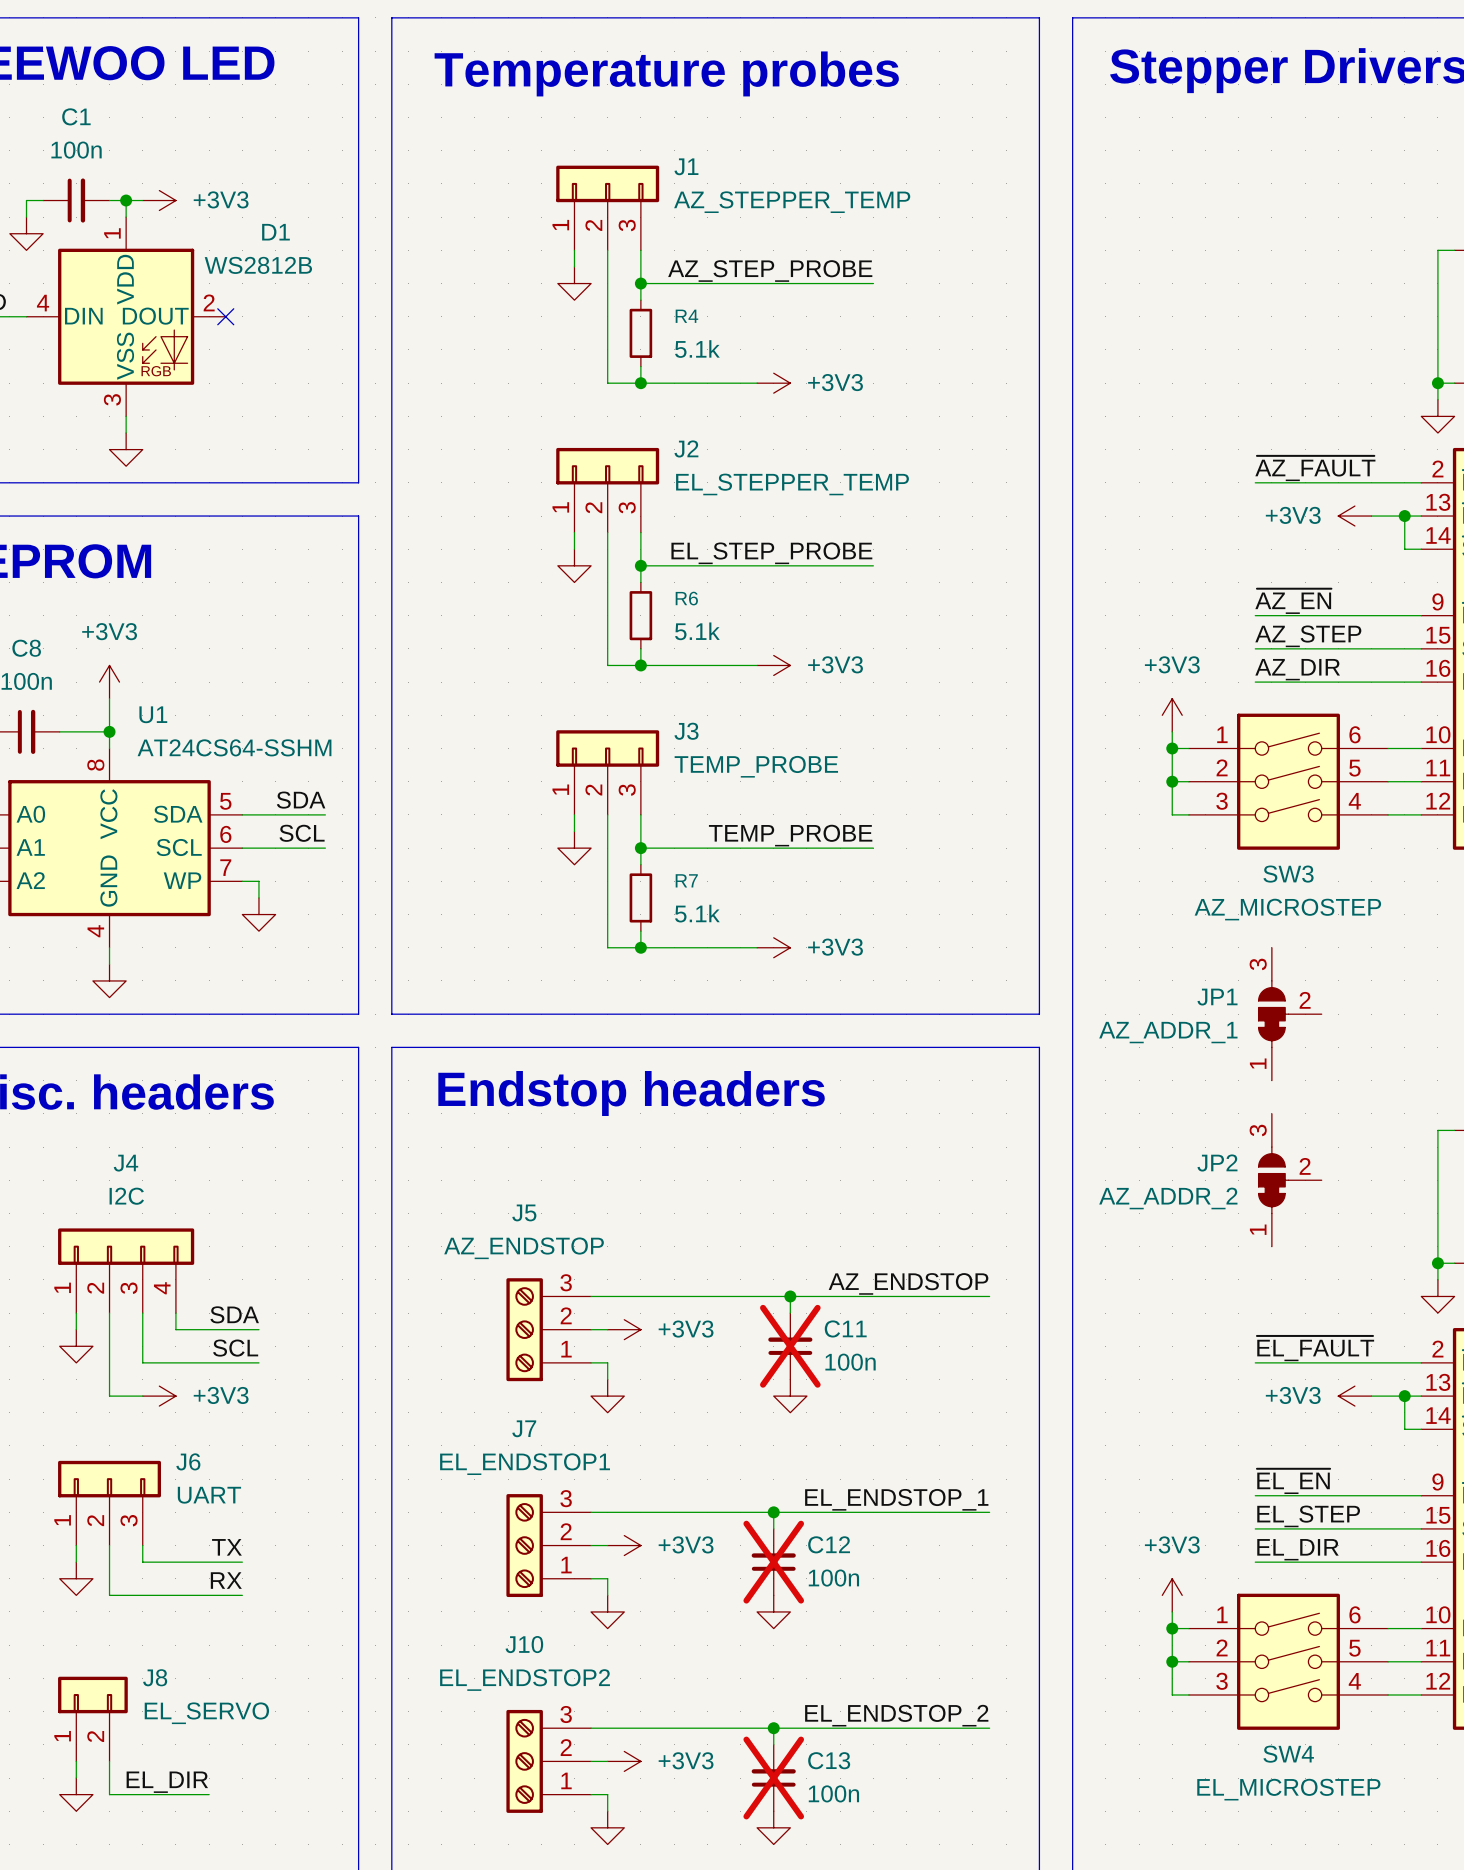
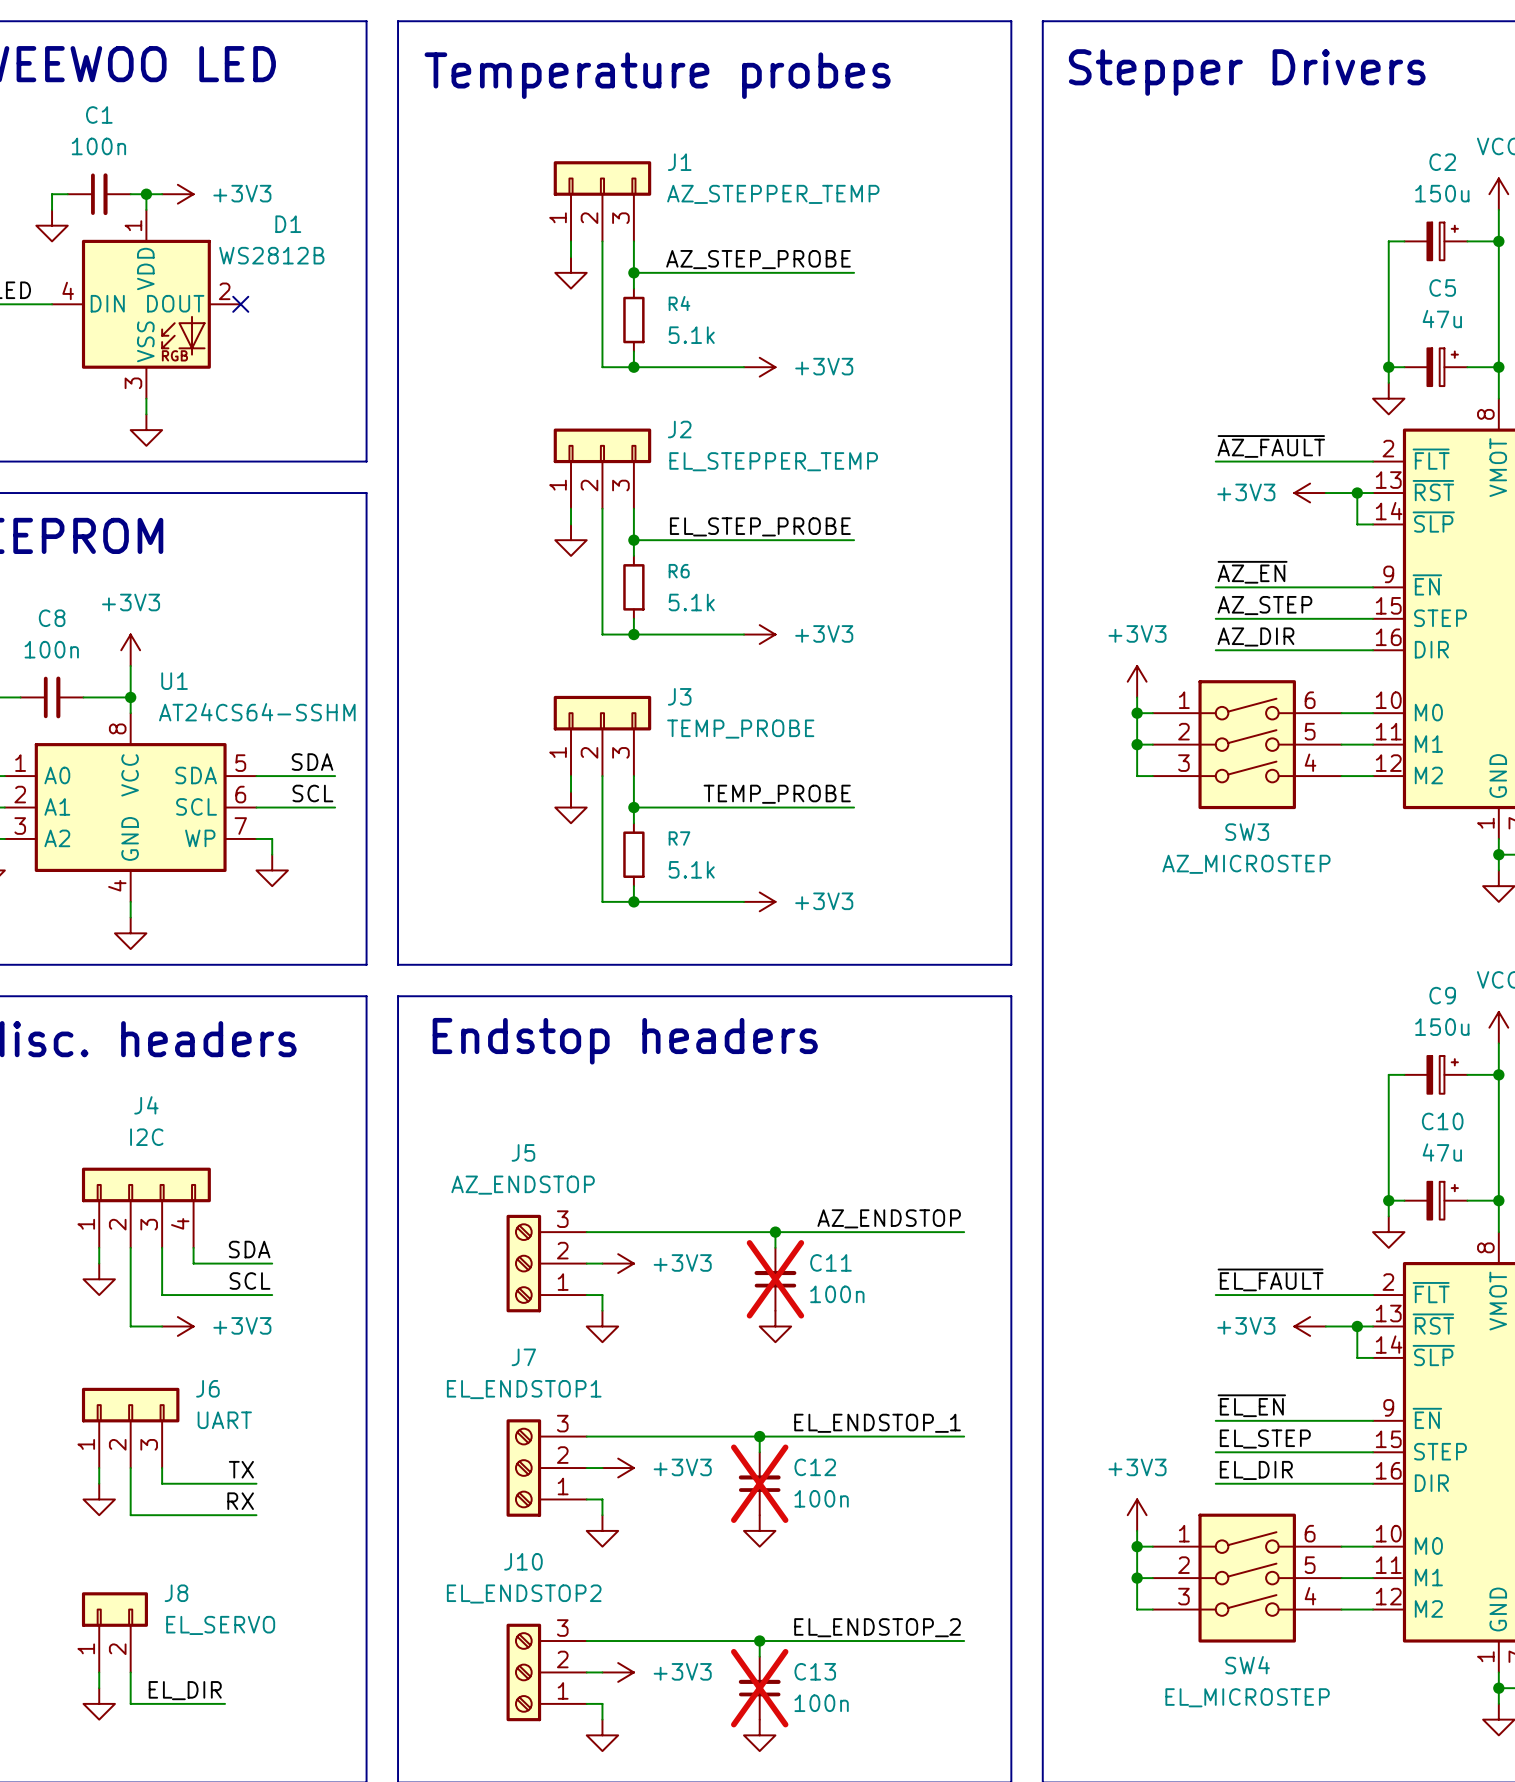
JP1: AZ_ADDR_1 (1290, 1014) -> none
JP2: AZ_ADDR_2 (1290, 1180) -> none

